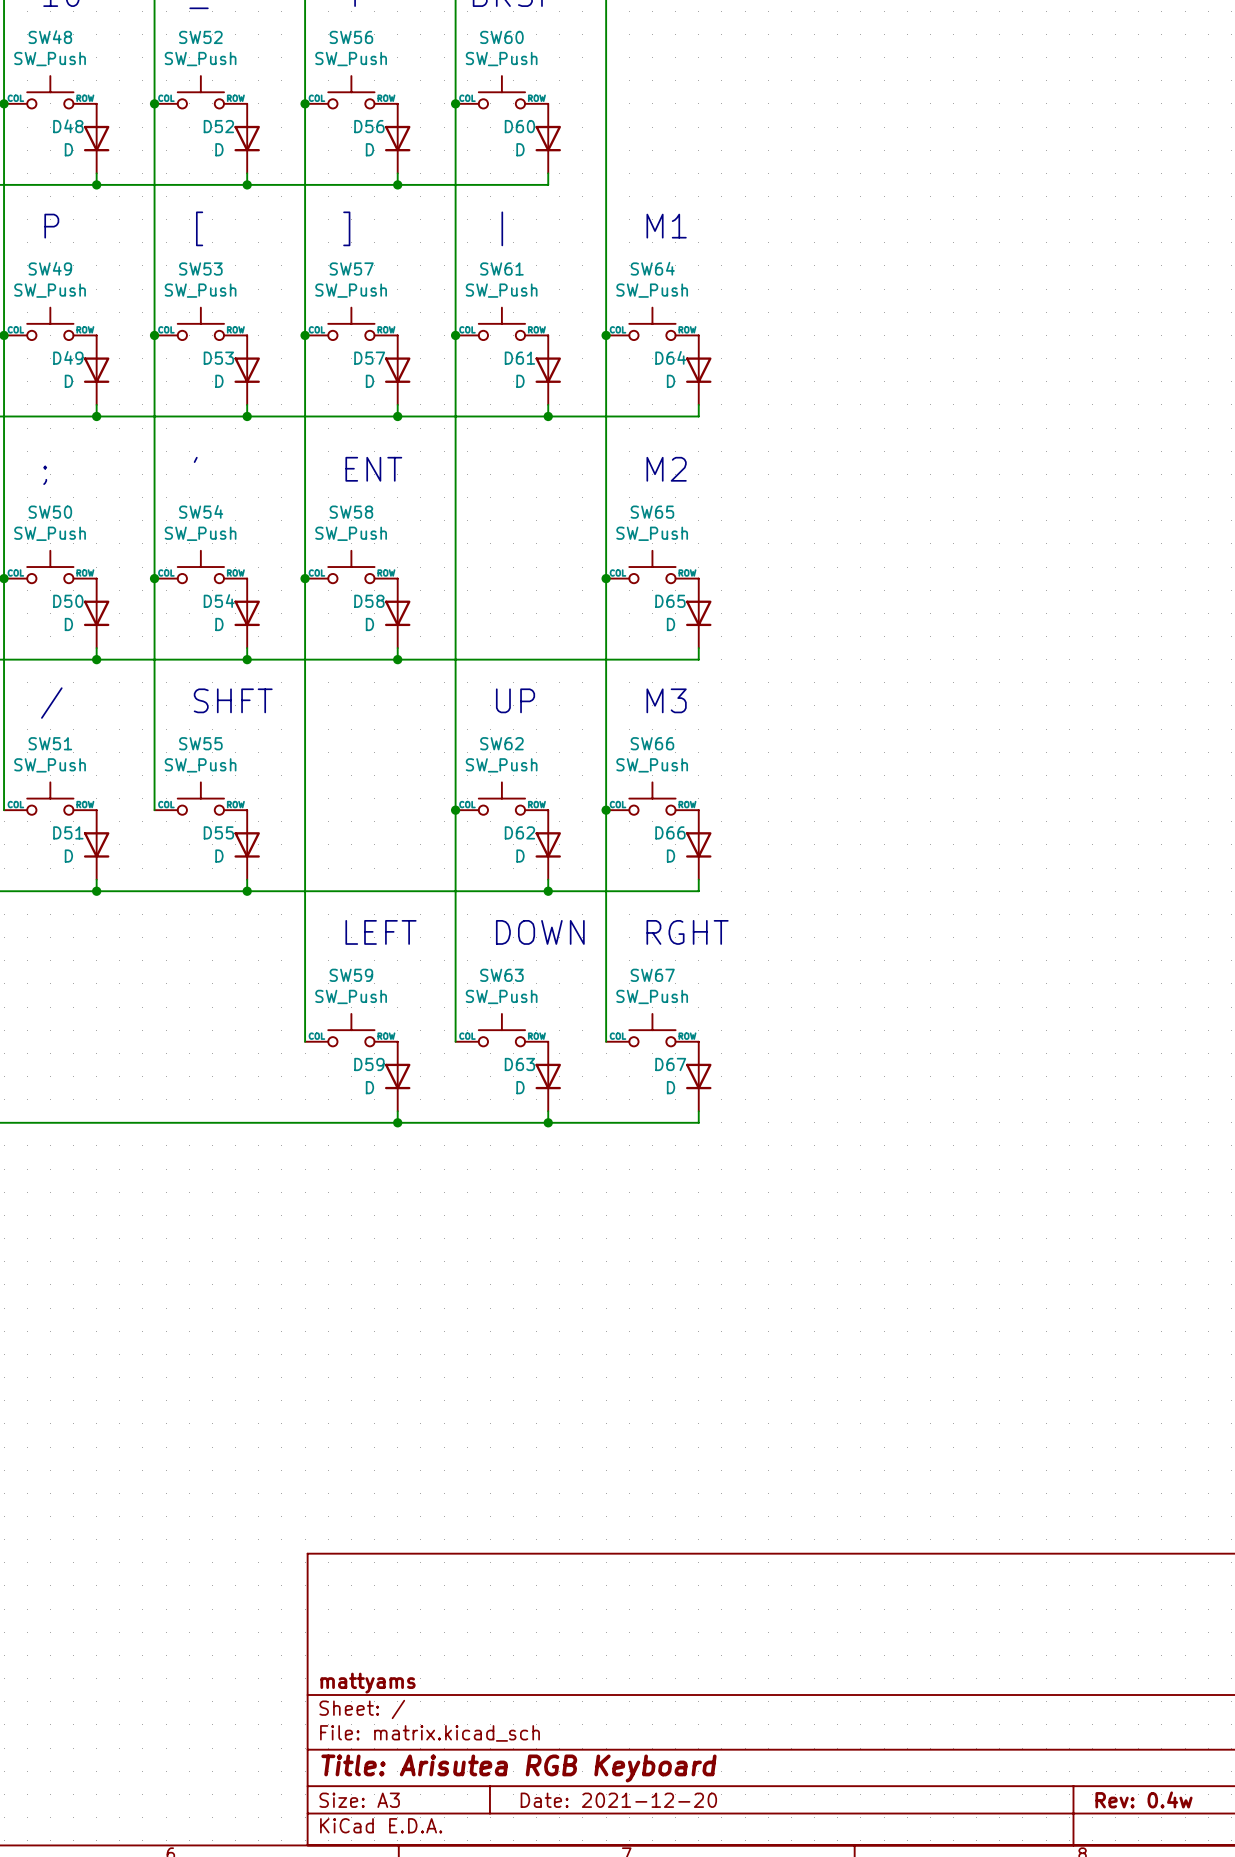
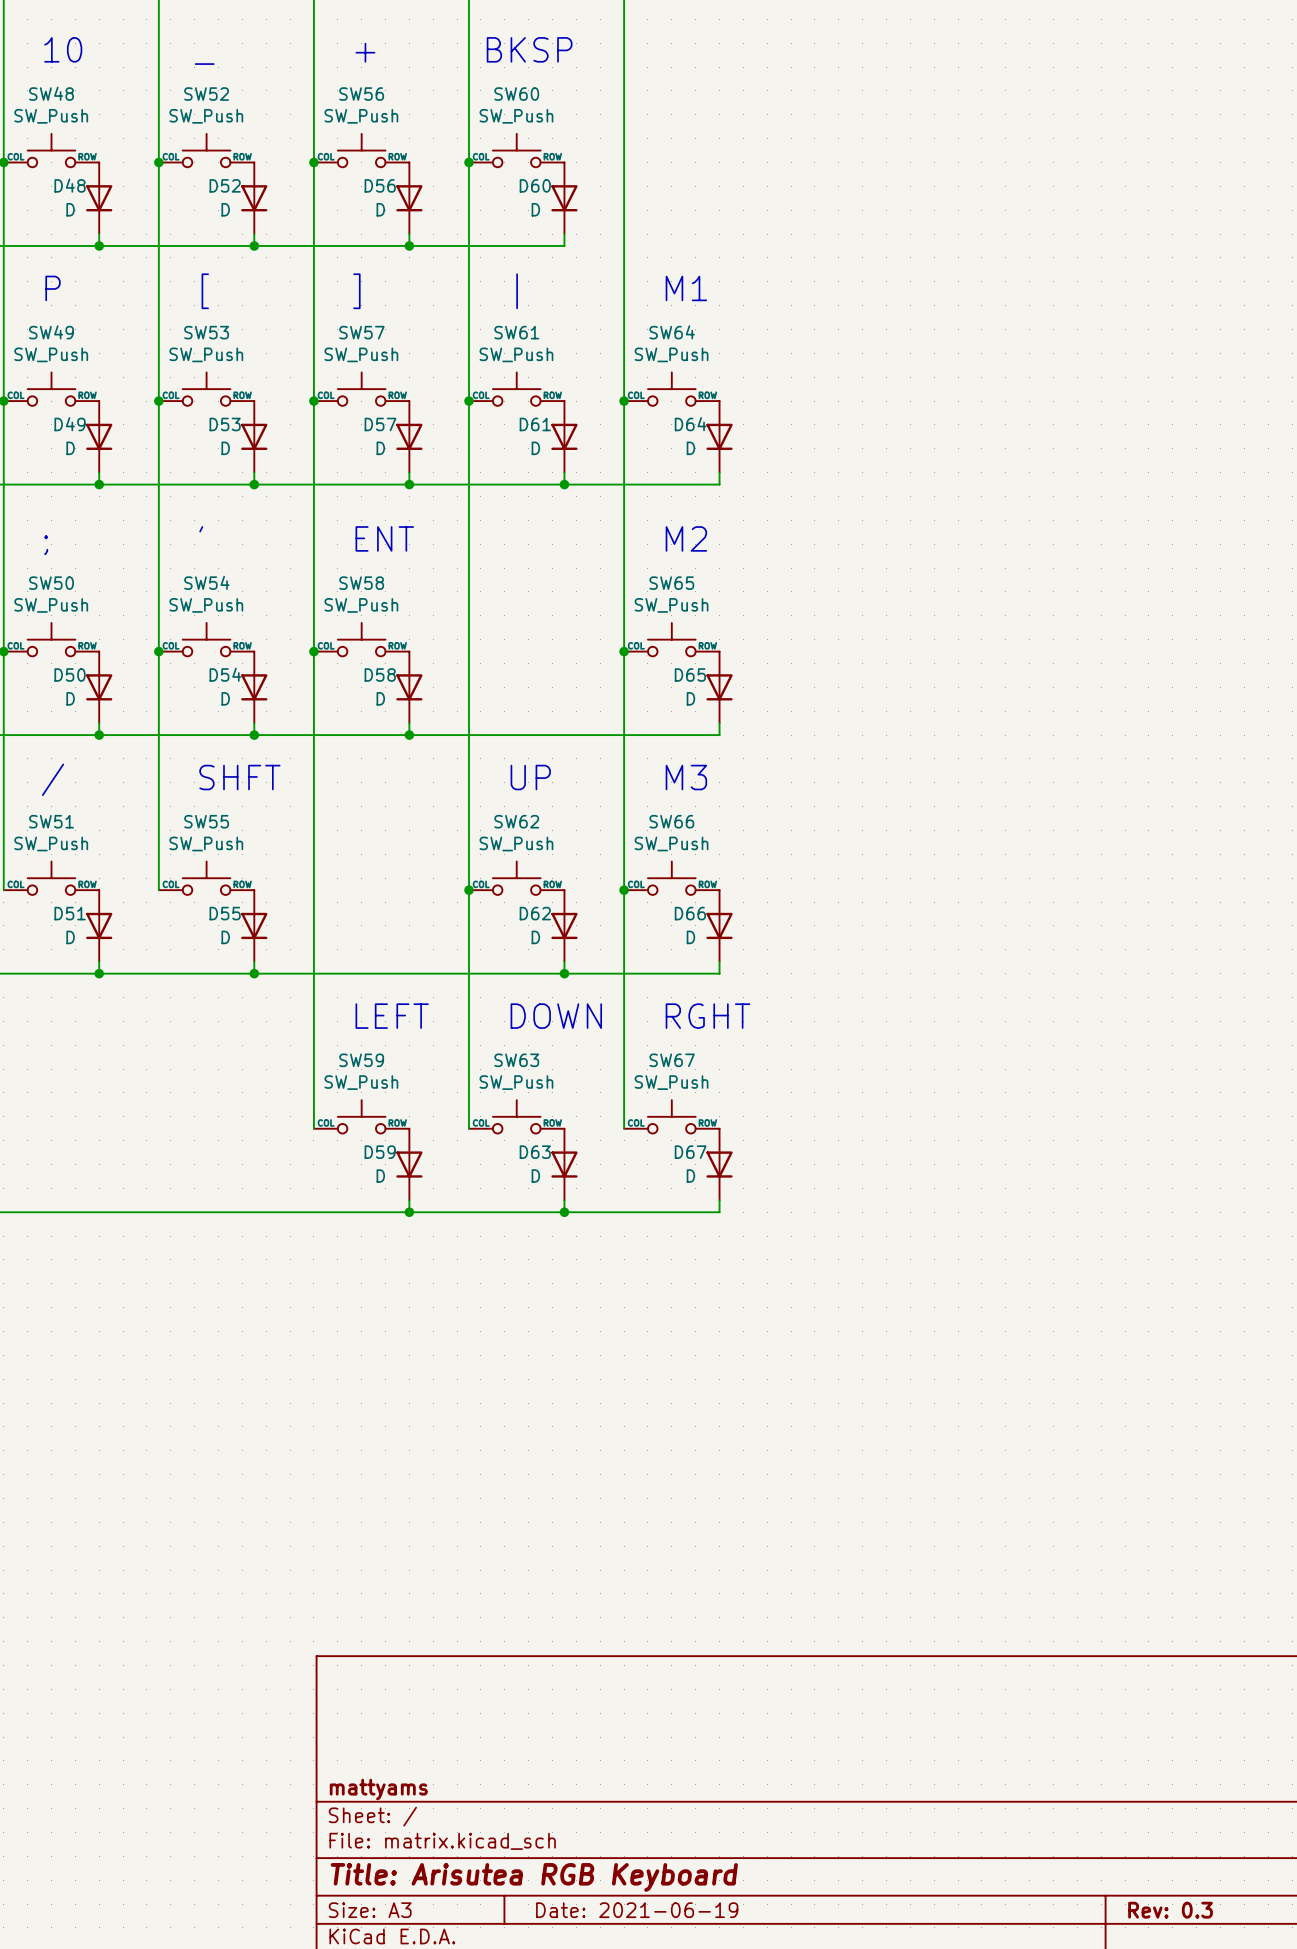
title block: Rev: 0.4w (1143, 1799) -> Rev: 0.3 (1170, 1910)
title block: Date: 2021-12-20 (618, 1800) -> Date: 2021-06-19 (637, 1910)

